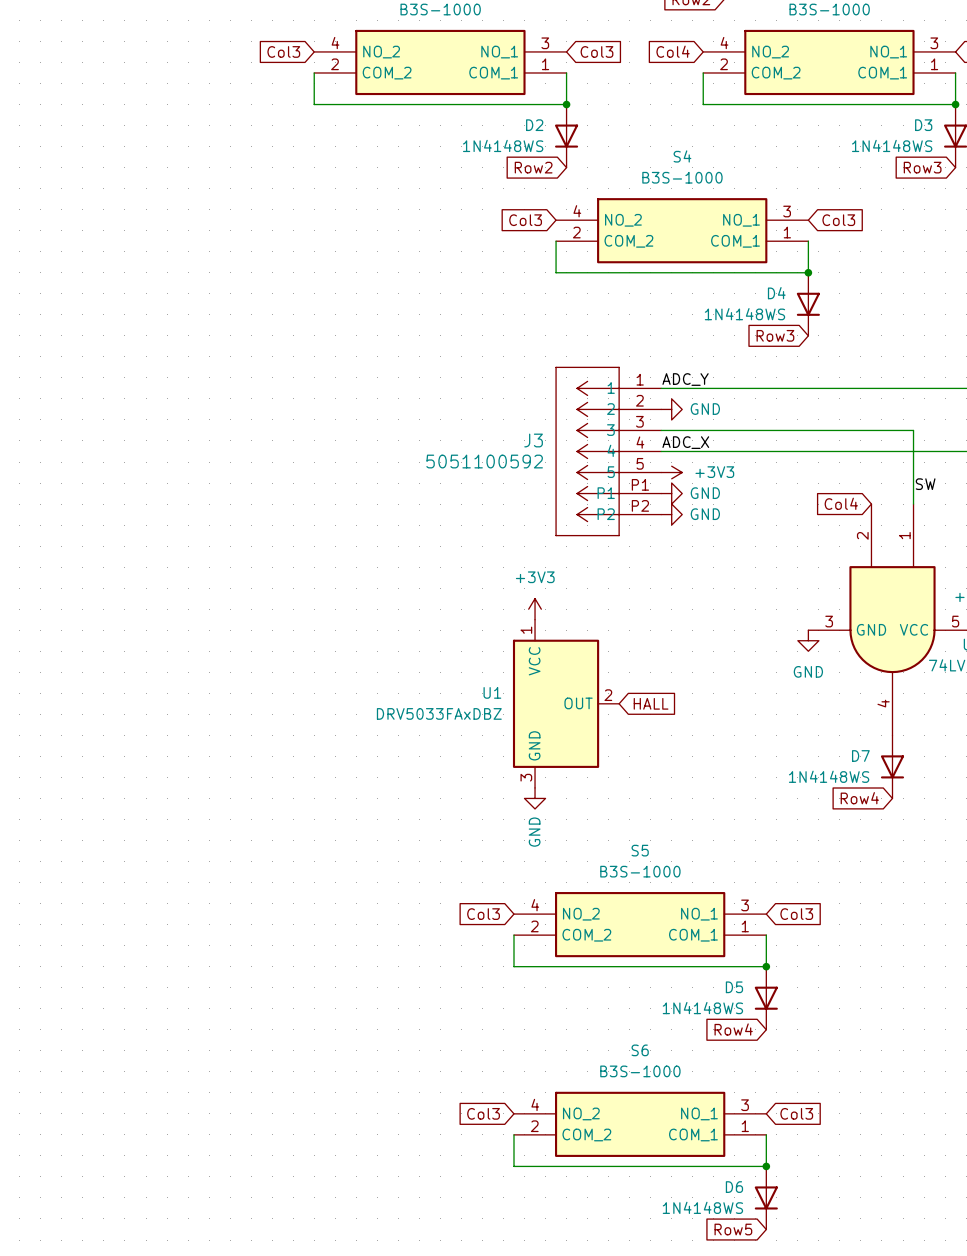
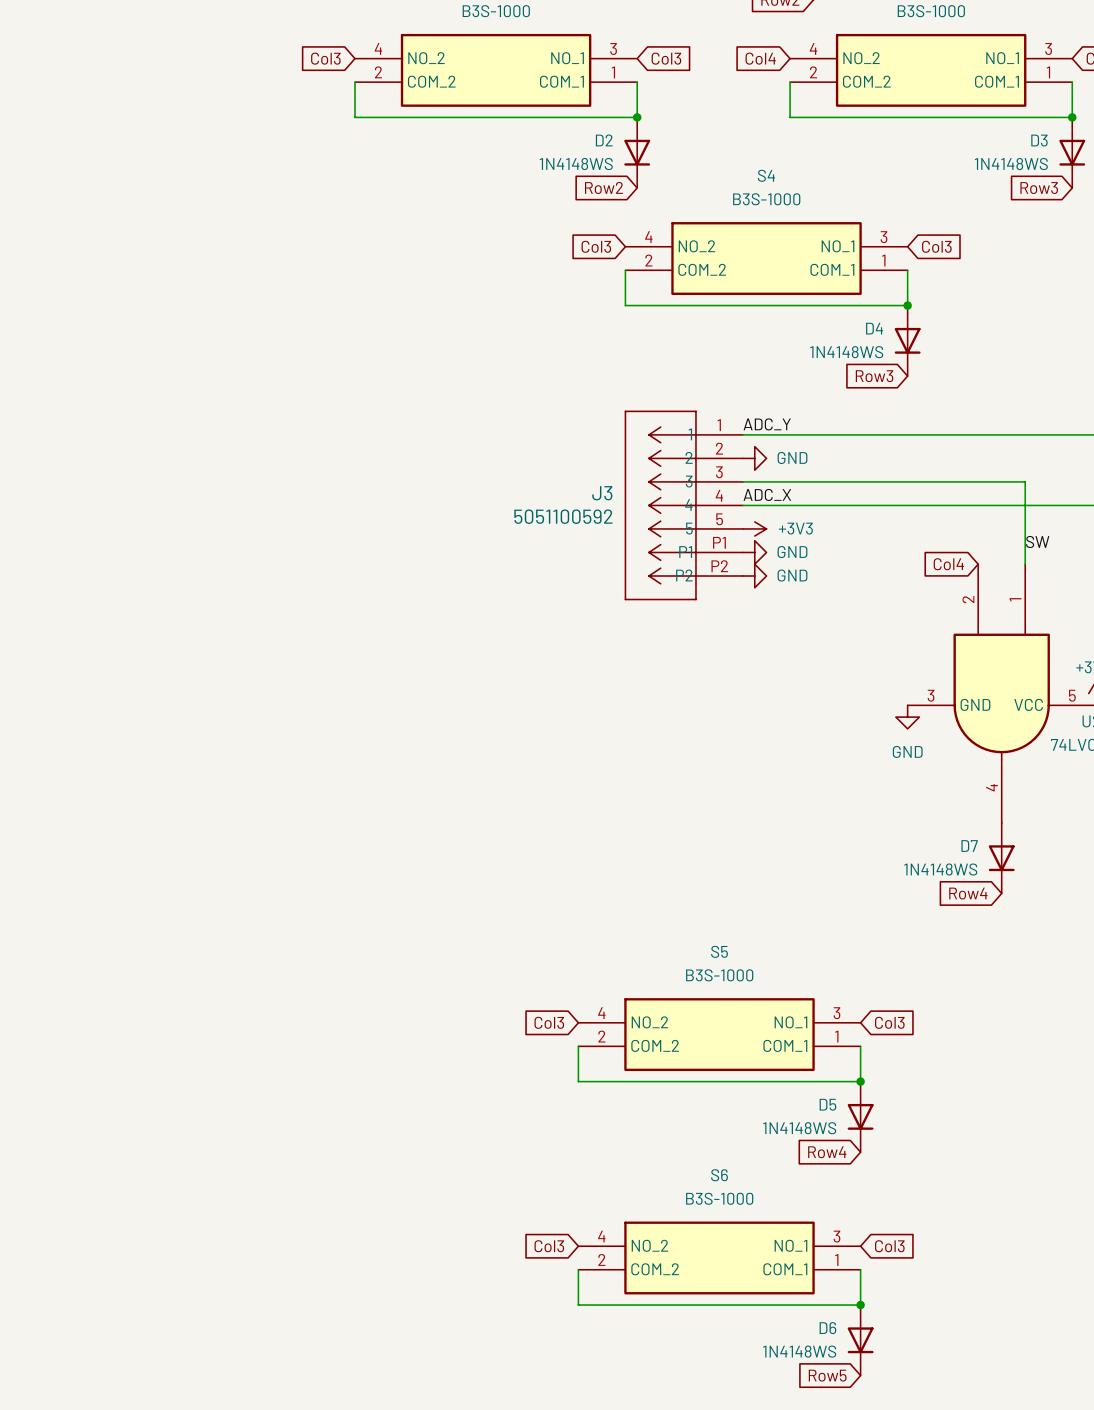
power symbol: +3V3 (535, 609) -> none
U1: DRV5033FAxDBZ (566, 703) -> none
global label: HALL (651, 703) -> none
power symbol: GND (535, 798) -> none

